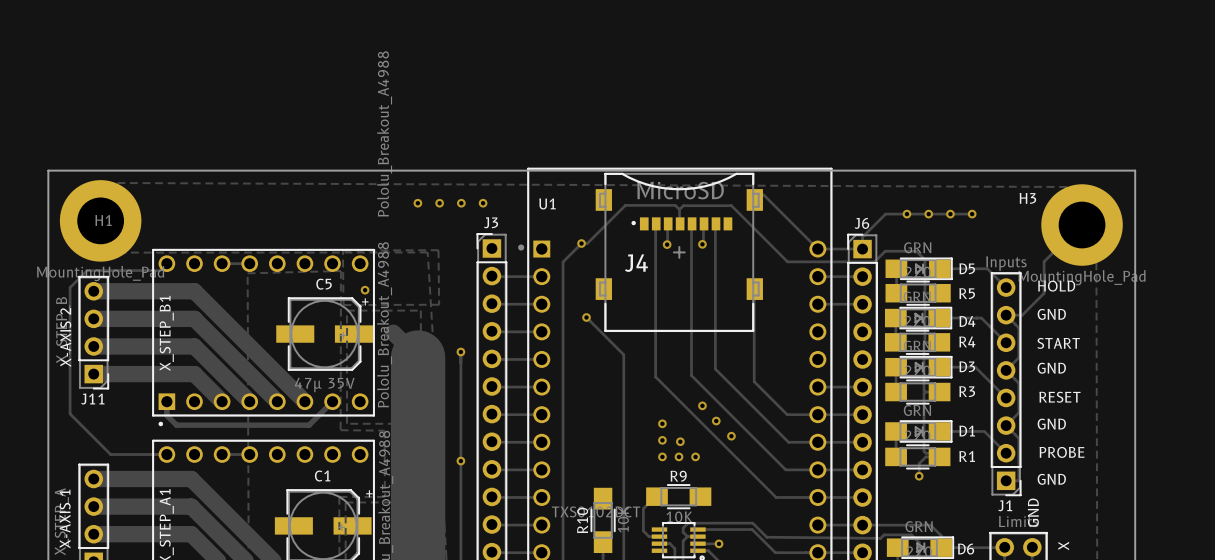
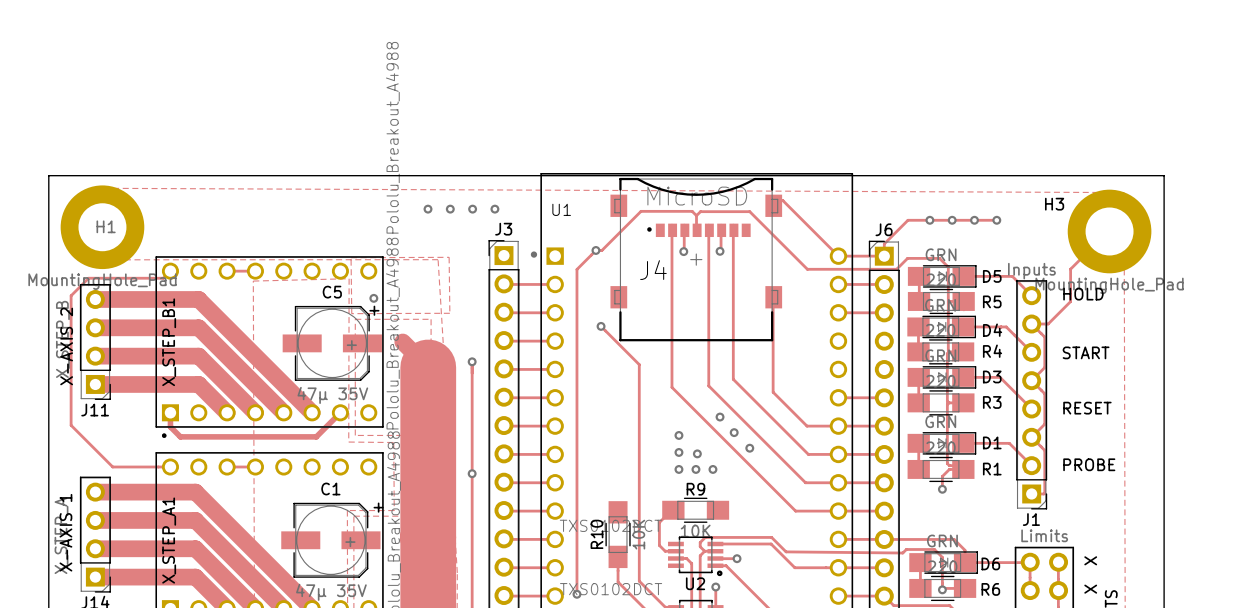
text: GND (1051, 314) -> none
text: GND (1051, 368) -> none
text: GND (1051, 424) -> none
text: GND (1051, 479) -> none
text: GND (1033, 512) -> none

